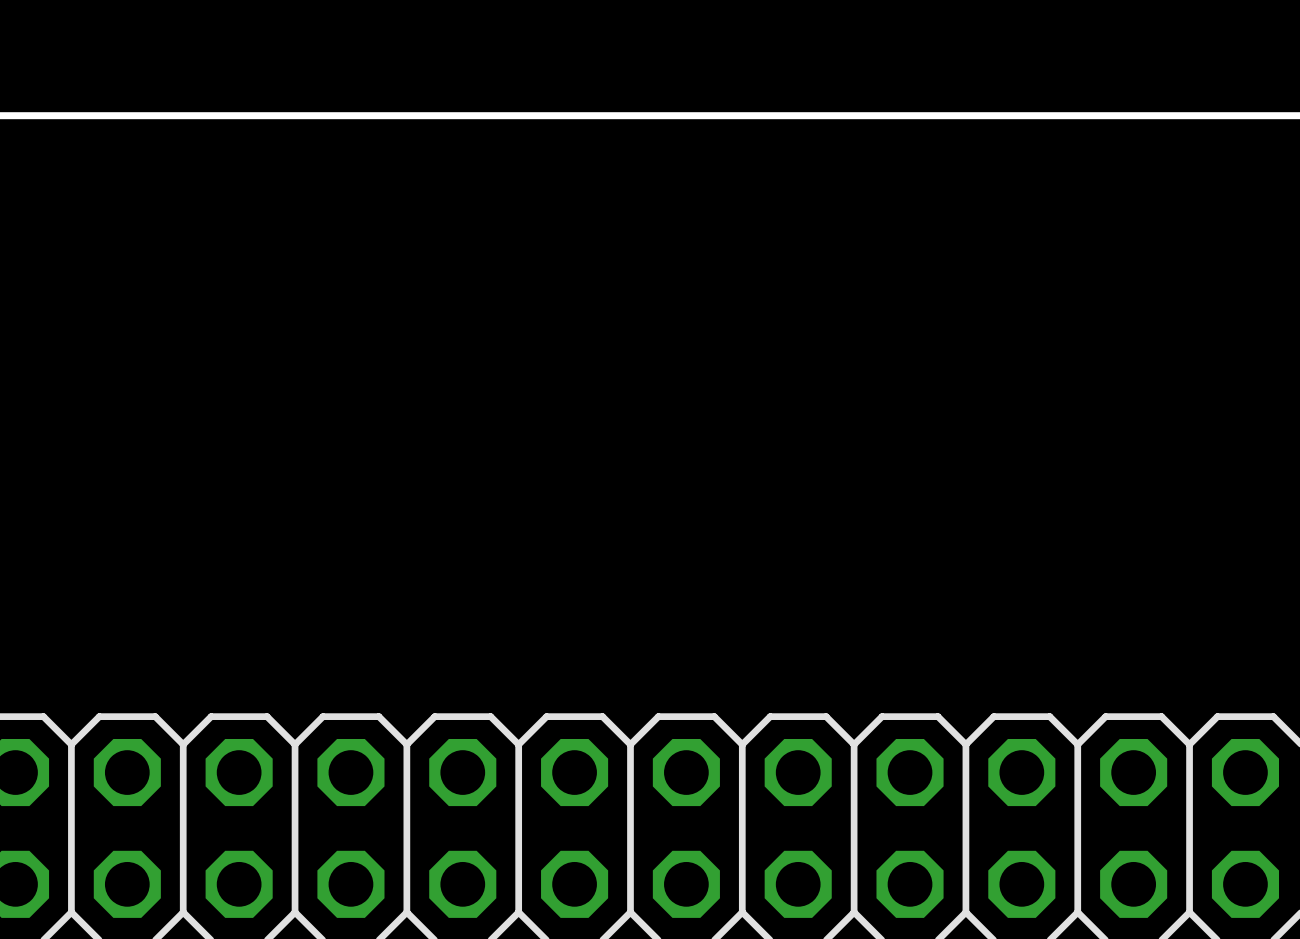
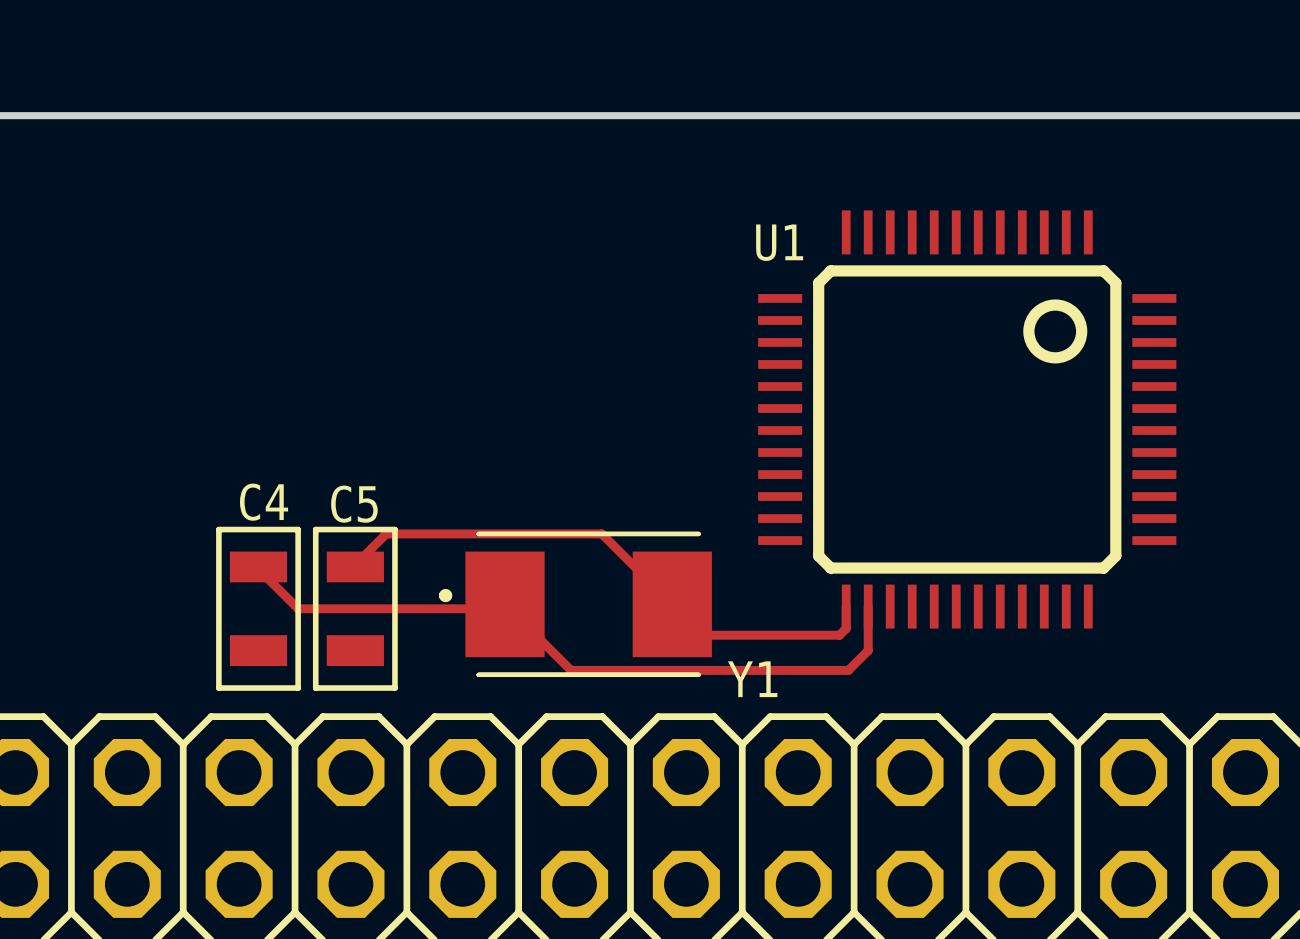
U1: none -> (967, 419)
track: none -> (258, 566) (258, 569) (298, 608) (500, 608) (505, 604) (571, 670) (848, 670) (868, 650) (868, 606)
track: none -> (355, 566) (355, 564) (386, 533) (601, 533) (672, 604) (672, 621) (685, 635) (839, 635) (846, 628) (846, 606)
Y1: none -> (575, 604)
C4: none -> (258, 608)
C5: none -> (355, 608)

